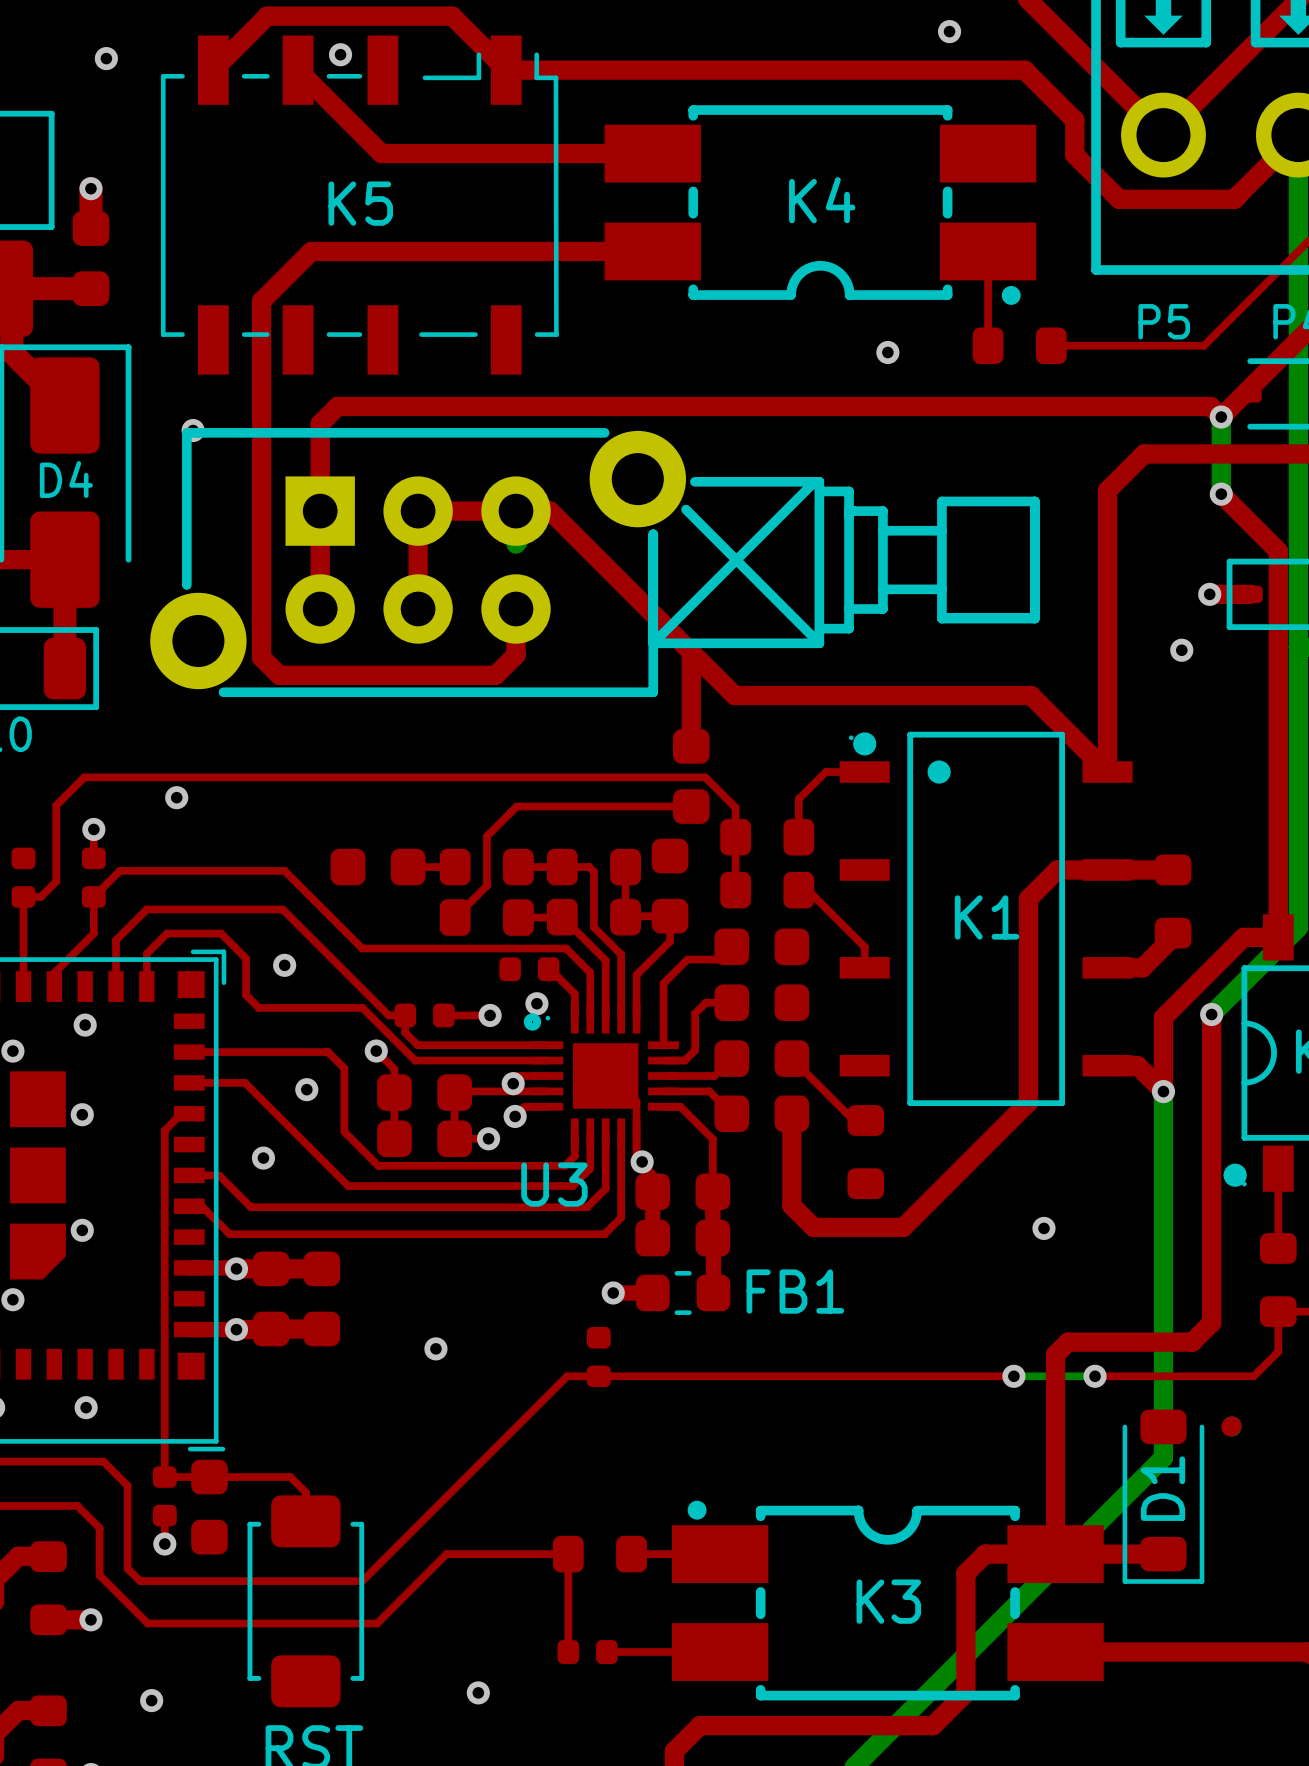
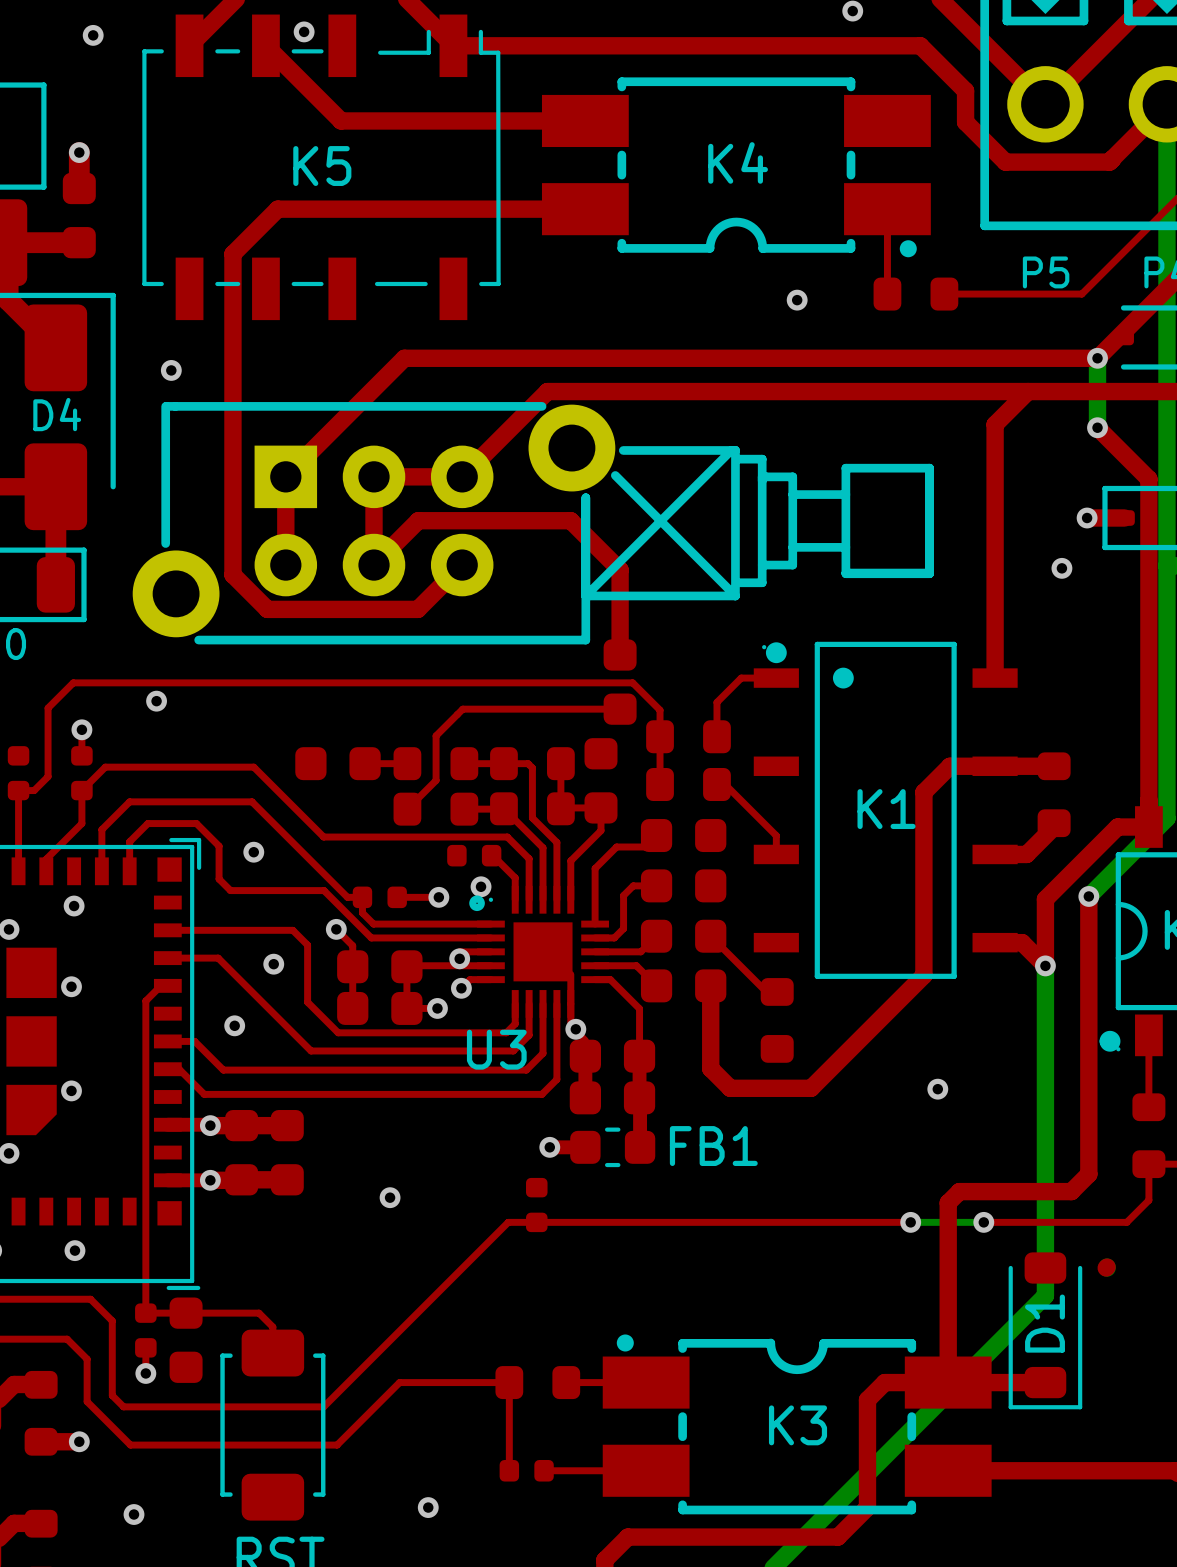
top track: (1221, 417) (1210, 406) (337, 406) (320, 423) (320, 548) -> (1097, 358) (404, 358) (285, 476)
top track: none -> (1028, 391) (547, 391) (462, 476) (374, 476)
top track: (418, 548) (418, 511) (550, 511) (636, 597) -> (374, 531) (374, 565) (418, 520) (570, 520)
part position: (594, 562) -> (533, 523)
top track: (516, 609) (516, 654) (495, 675) (279, 675) -> (462, 565) (417, 609) (267, 609) (248, 590)
top track: (691, 652) (734, 695) (1031, 695) (1107, 772) -> none

